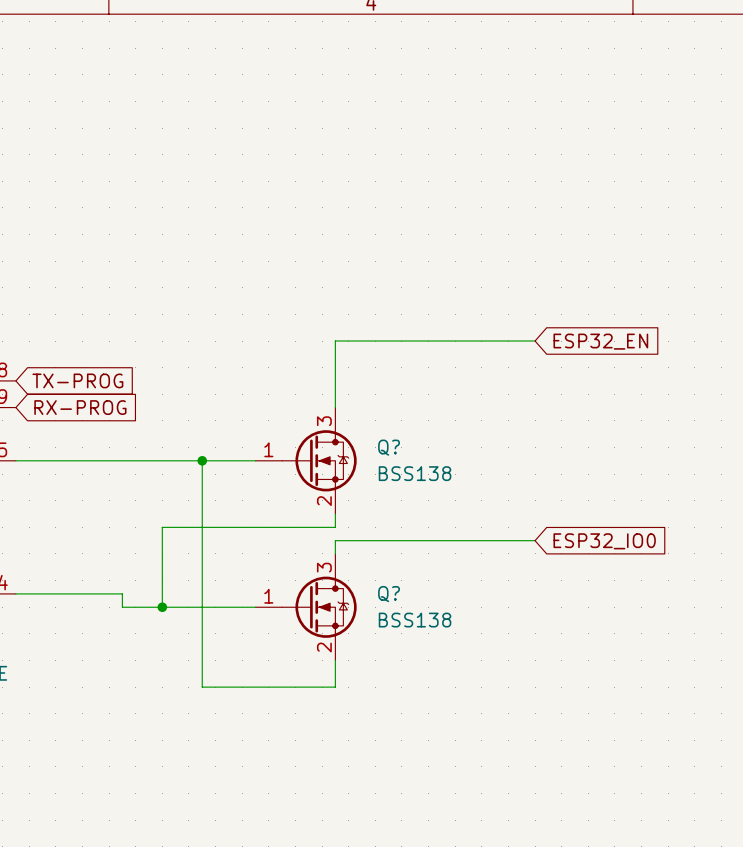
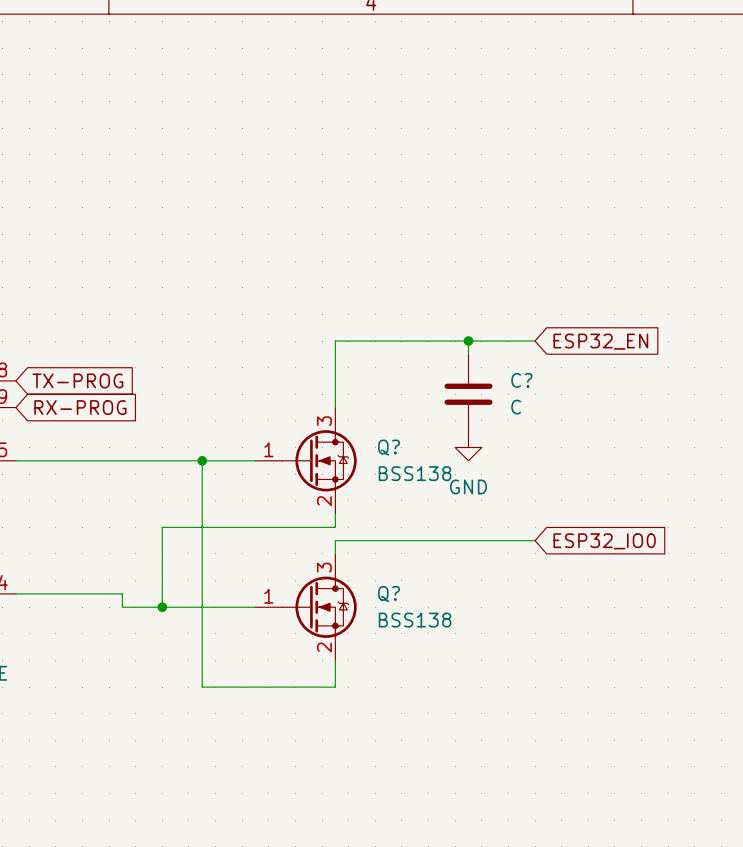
wire: none -> (468, 341) (468, 354)
junction: none -> (468, 341)
C?: none -> C (468, 394)
power symbol: none -> GND (468, 447)

